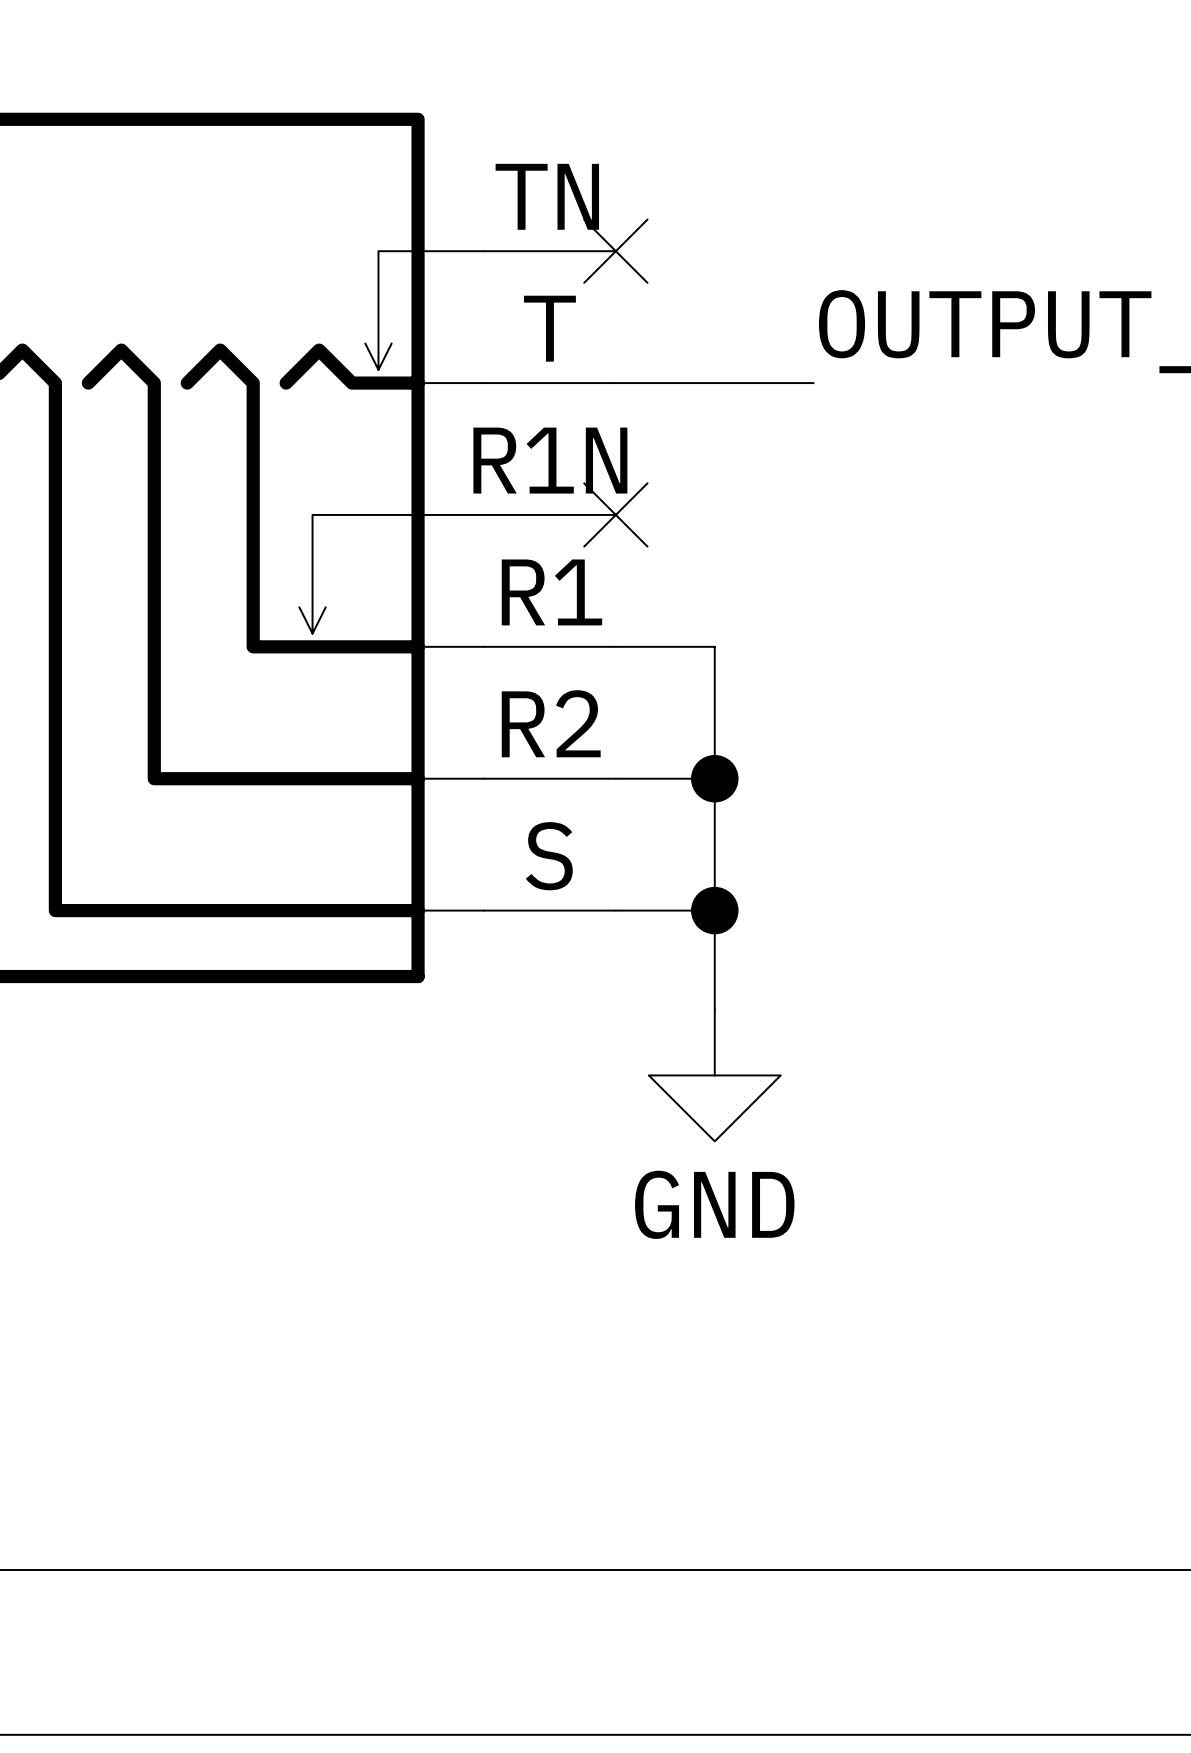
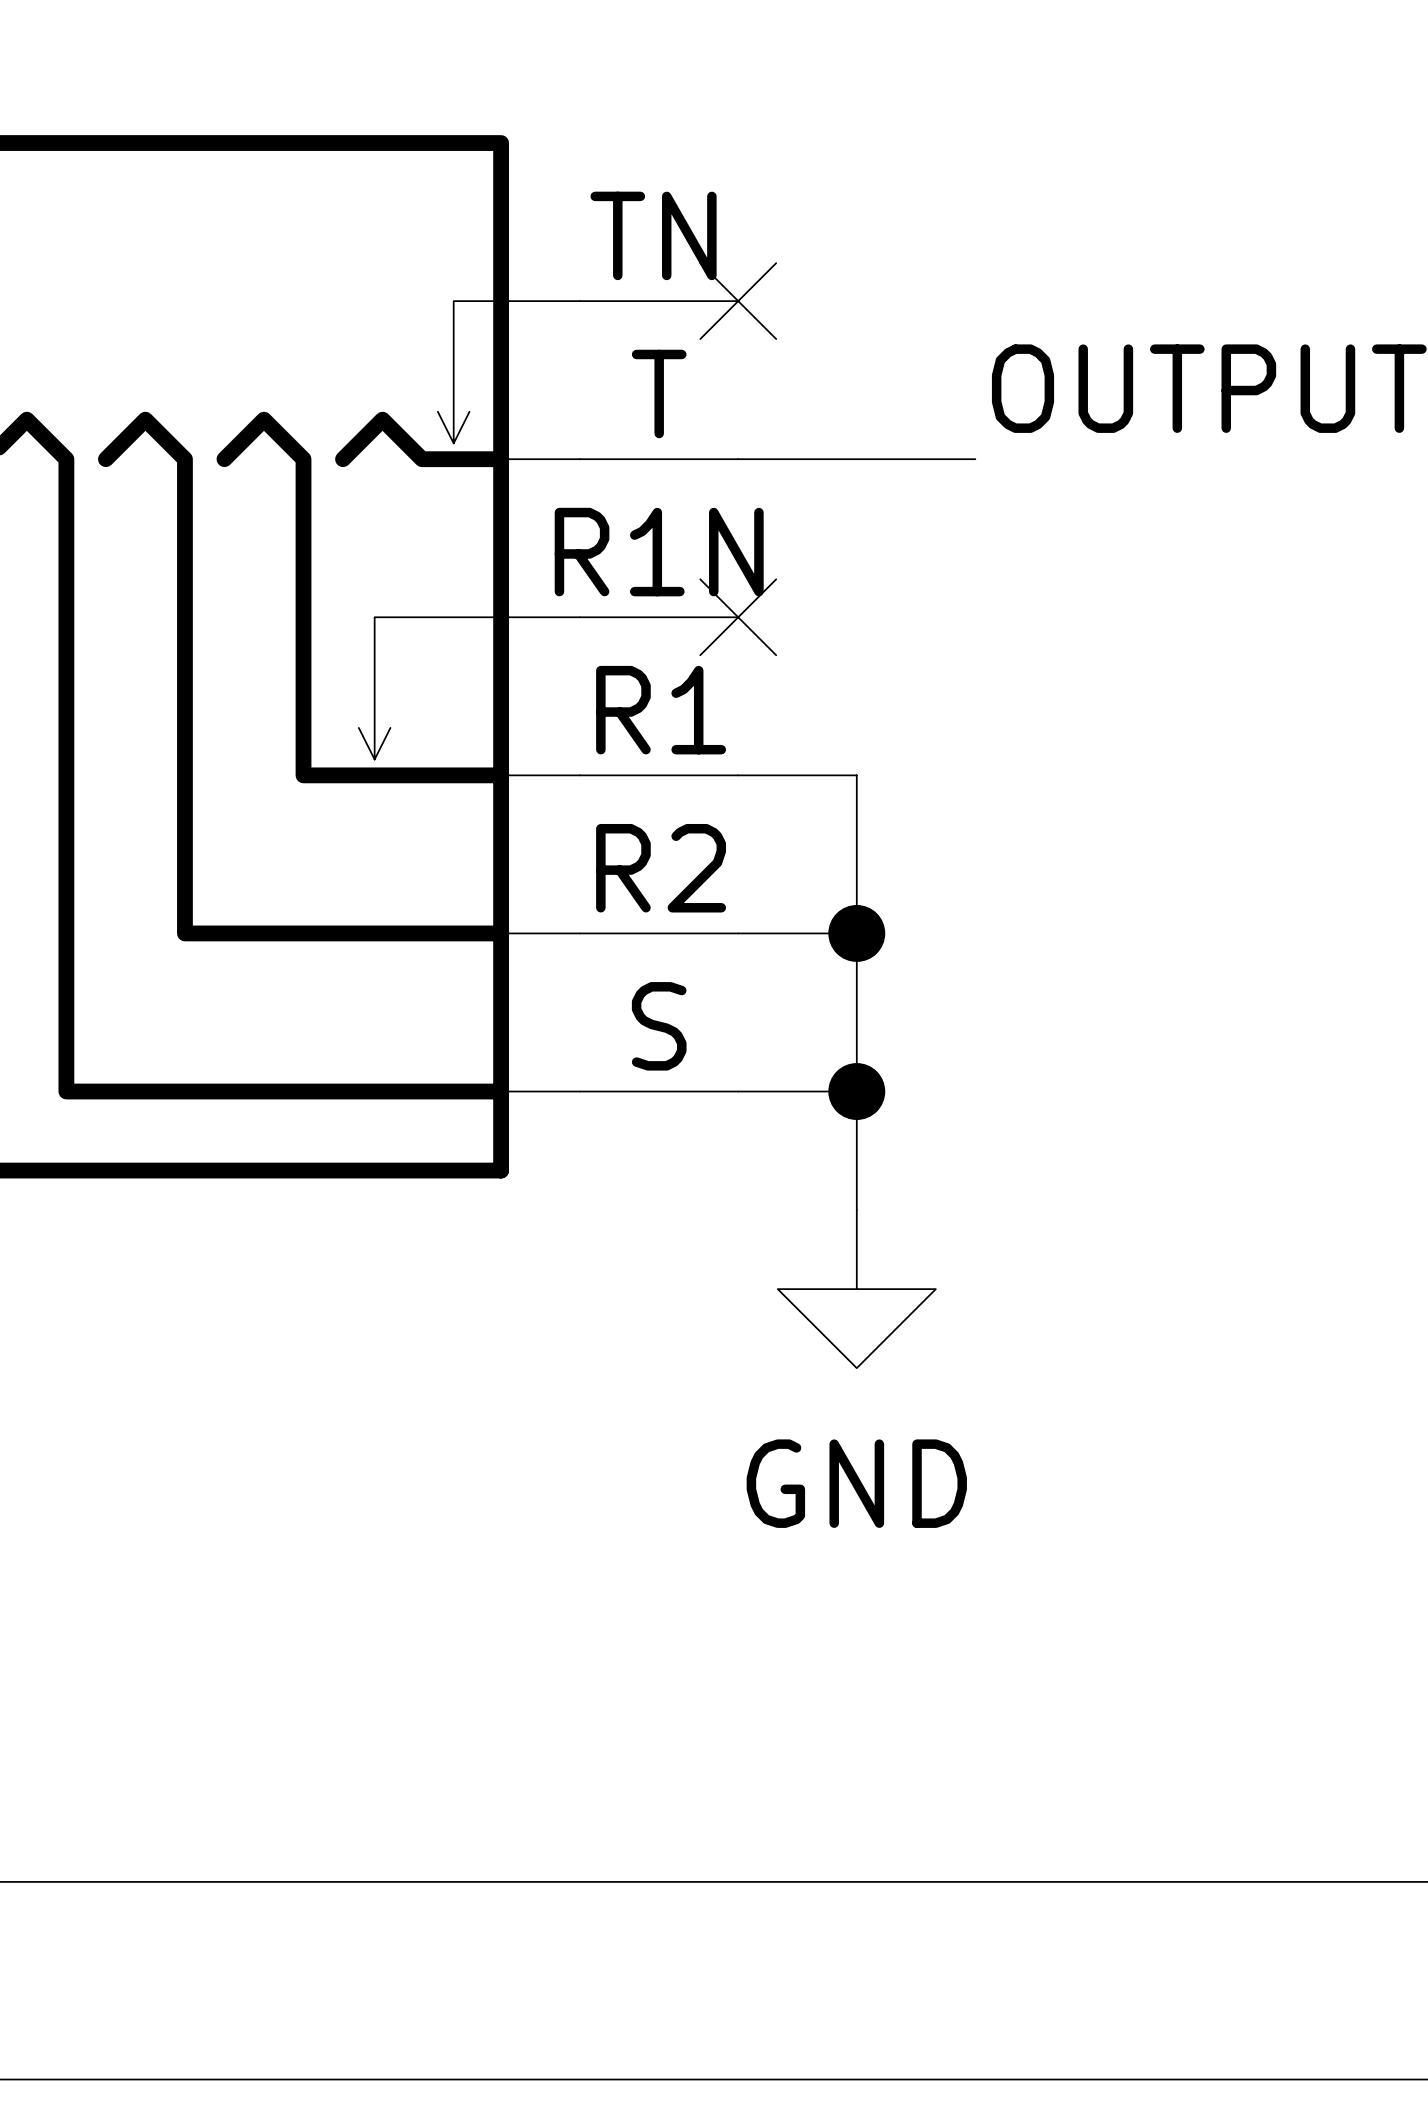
power symbol text position: GND (714, 1204) -> GND (856, 1483)

